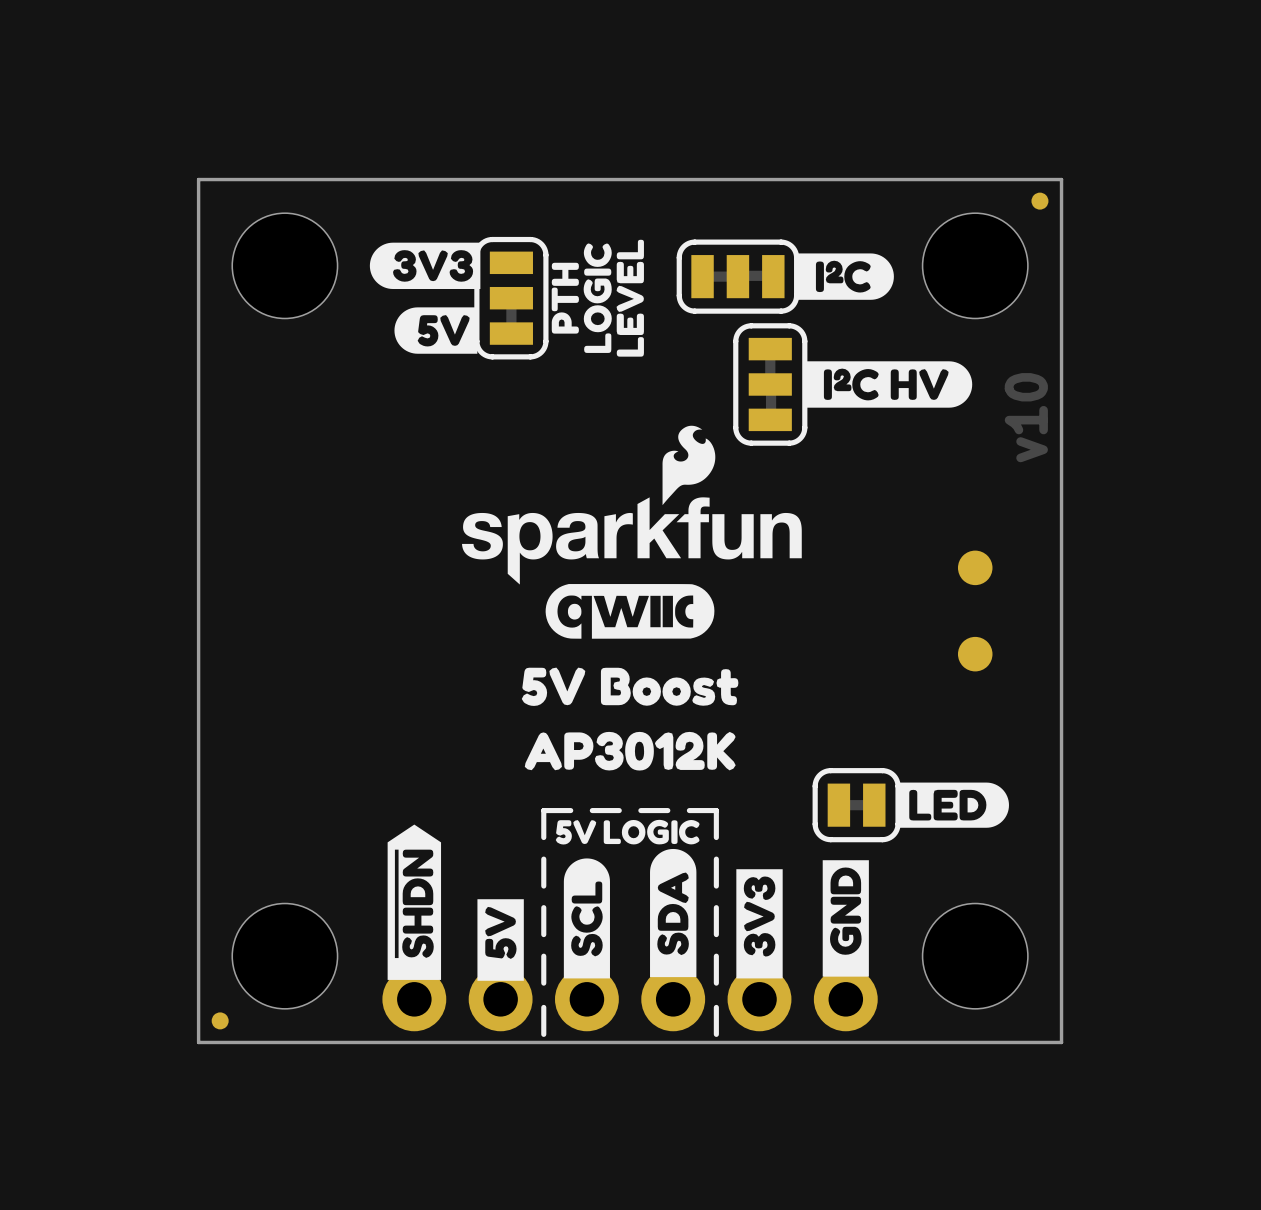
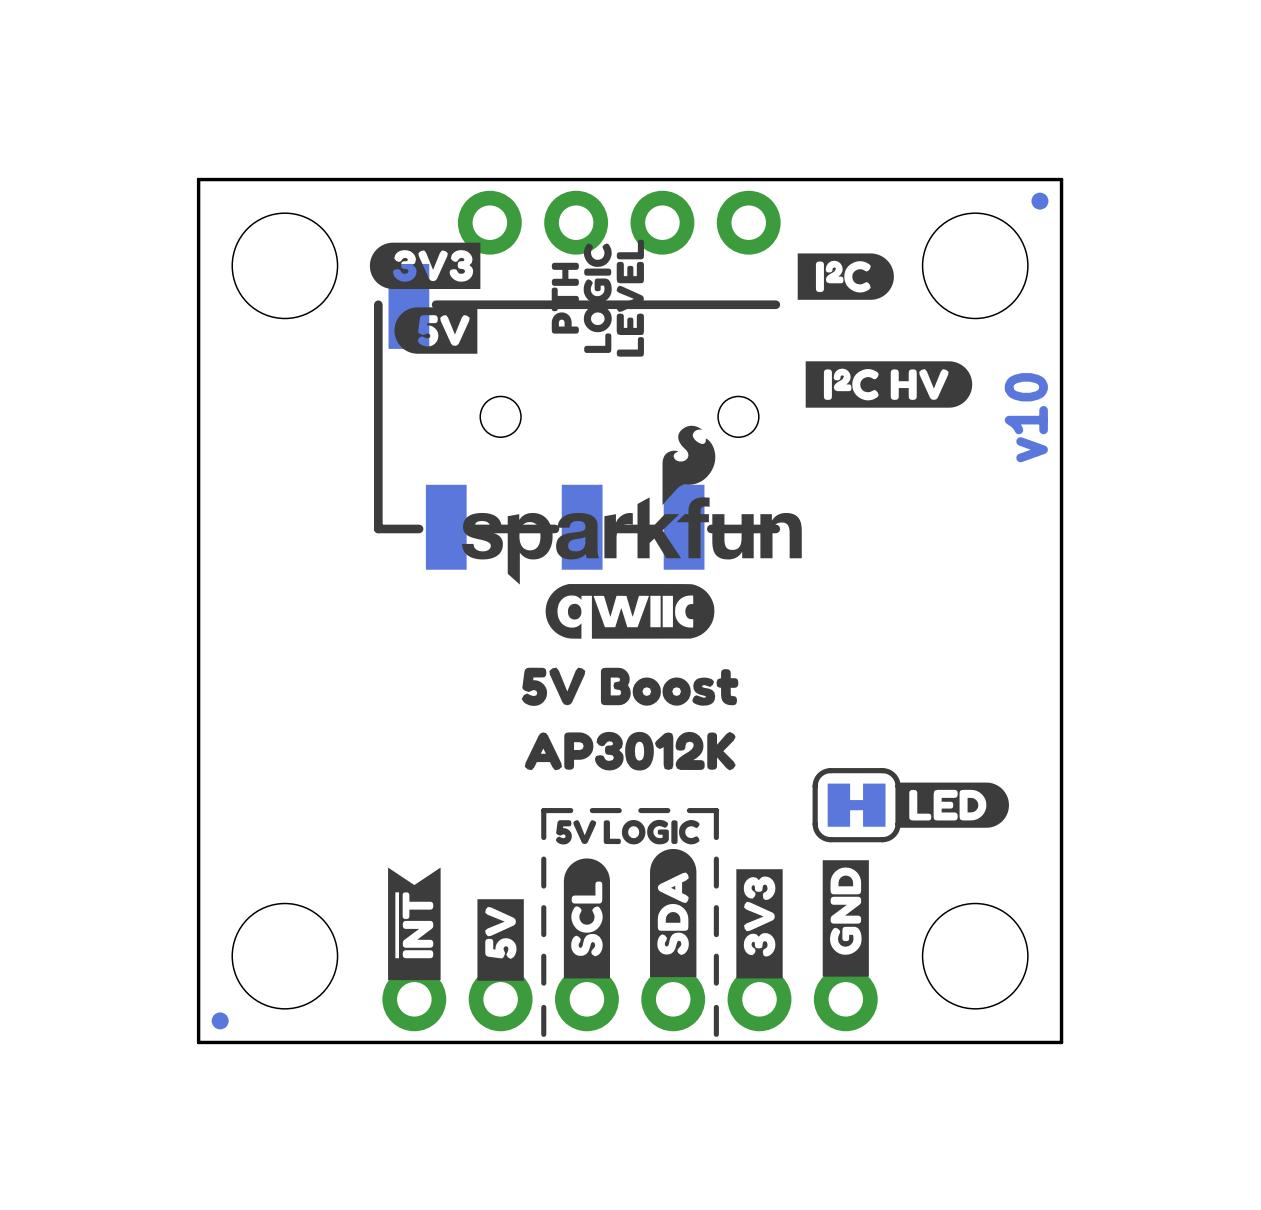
part: none -> (619, 222)
part: (737, 276) -> none
part: (511, 298) -> none
part: (770, 384) -> none
part: none -> (577, 416)
part: (975, 567) -> none
part: (975, 654) -> none
drawing shape: [387, 824, 442, 980] -> [388, 867, 441, 981]

